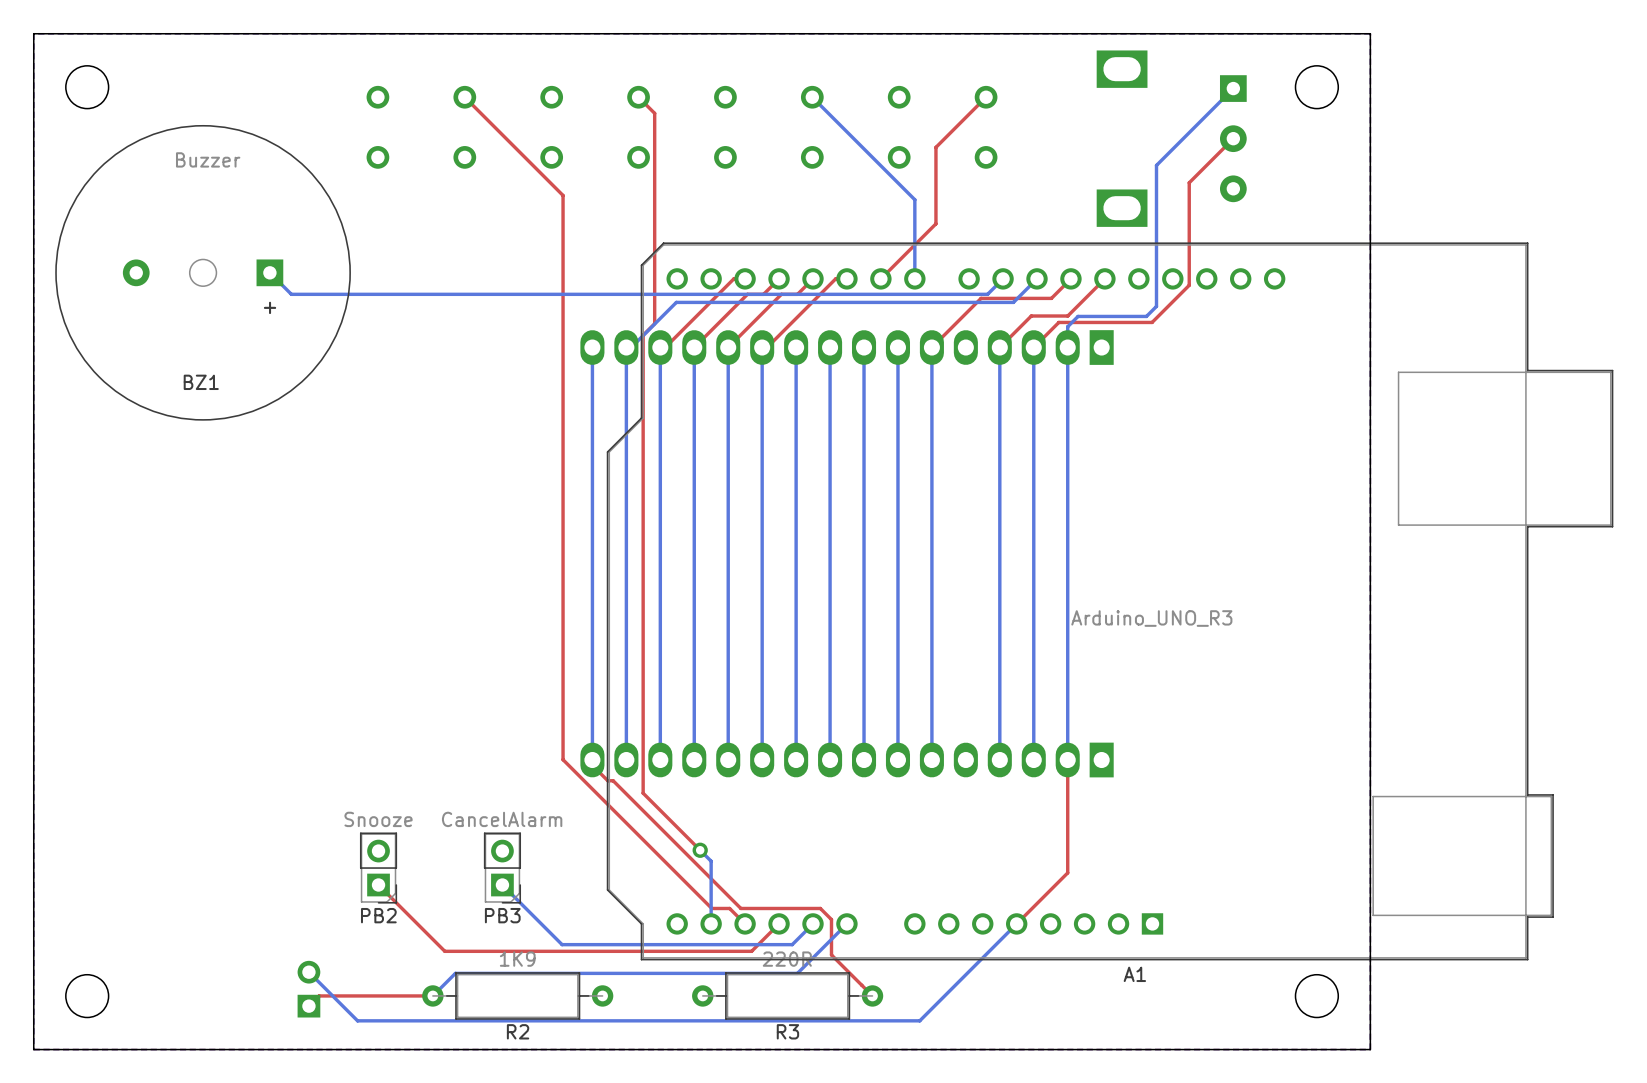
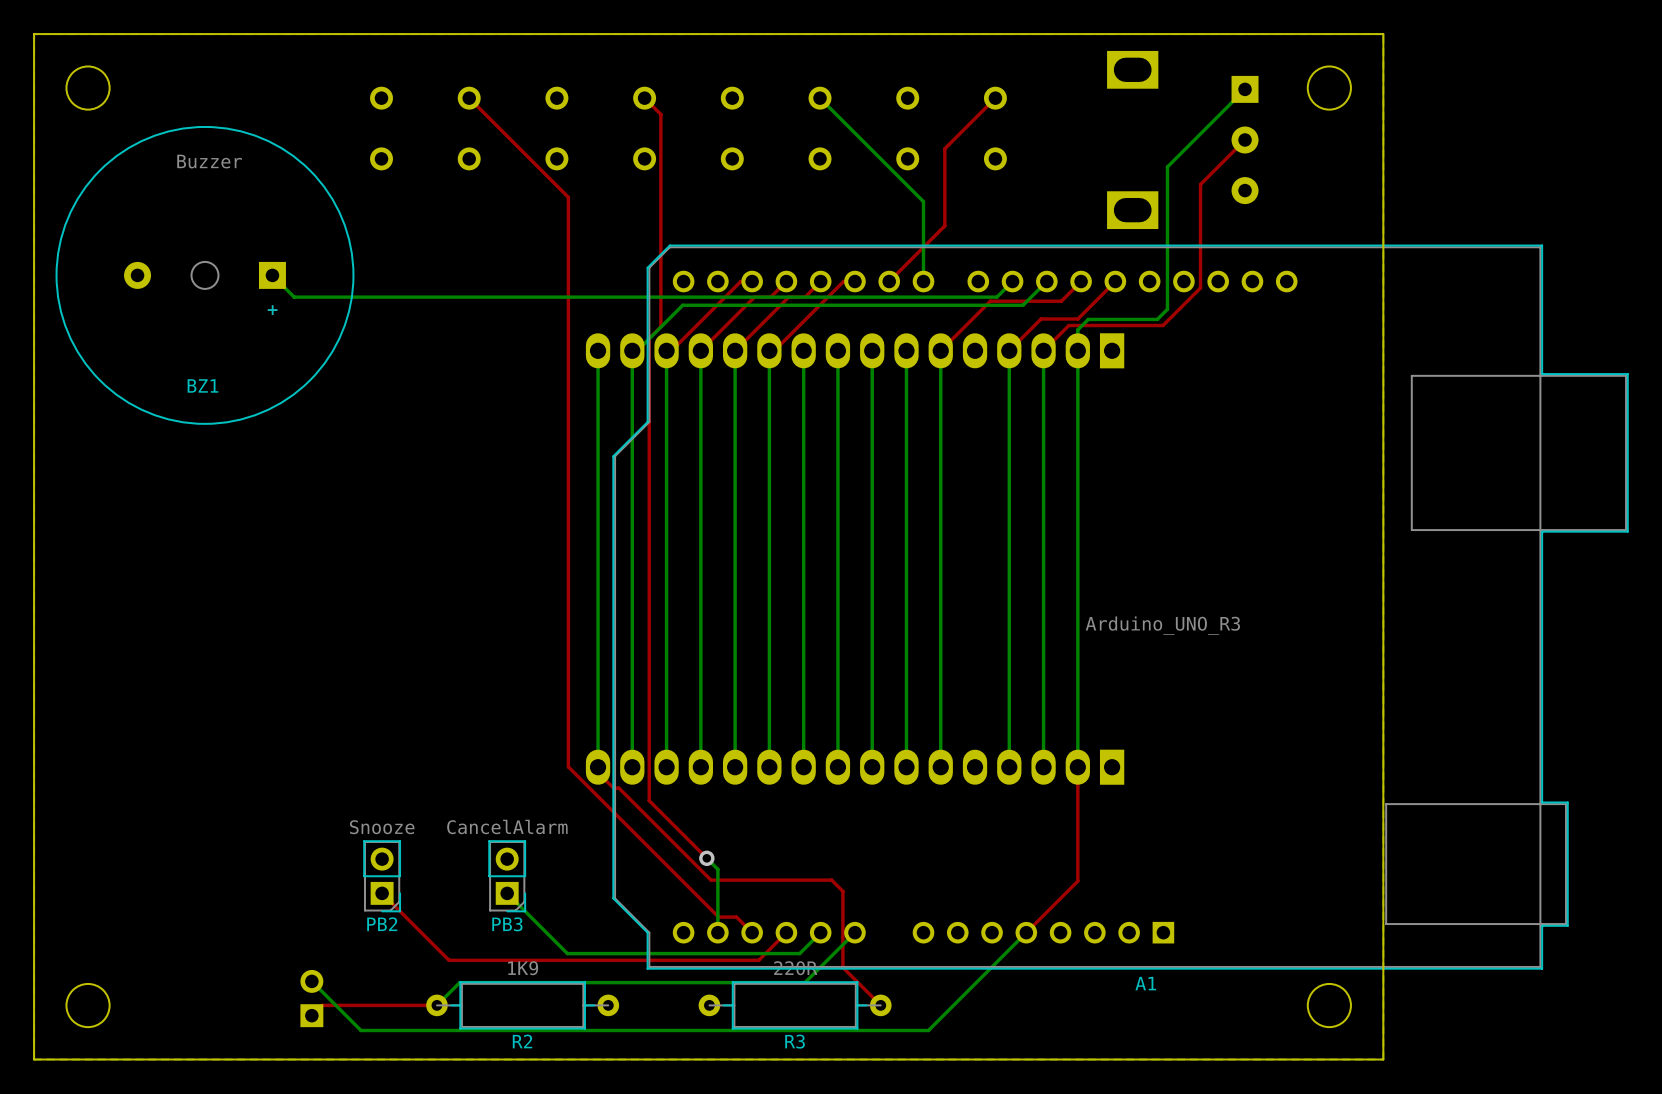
top track: (704, 871) (740, 908) (820, 908) (831, 919) (831, 954) (834, 958) -> (710, 880) (831, 880) (842, 891) (842, 967)

